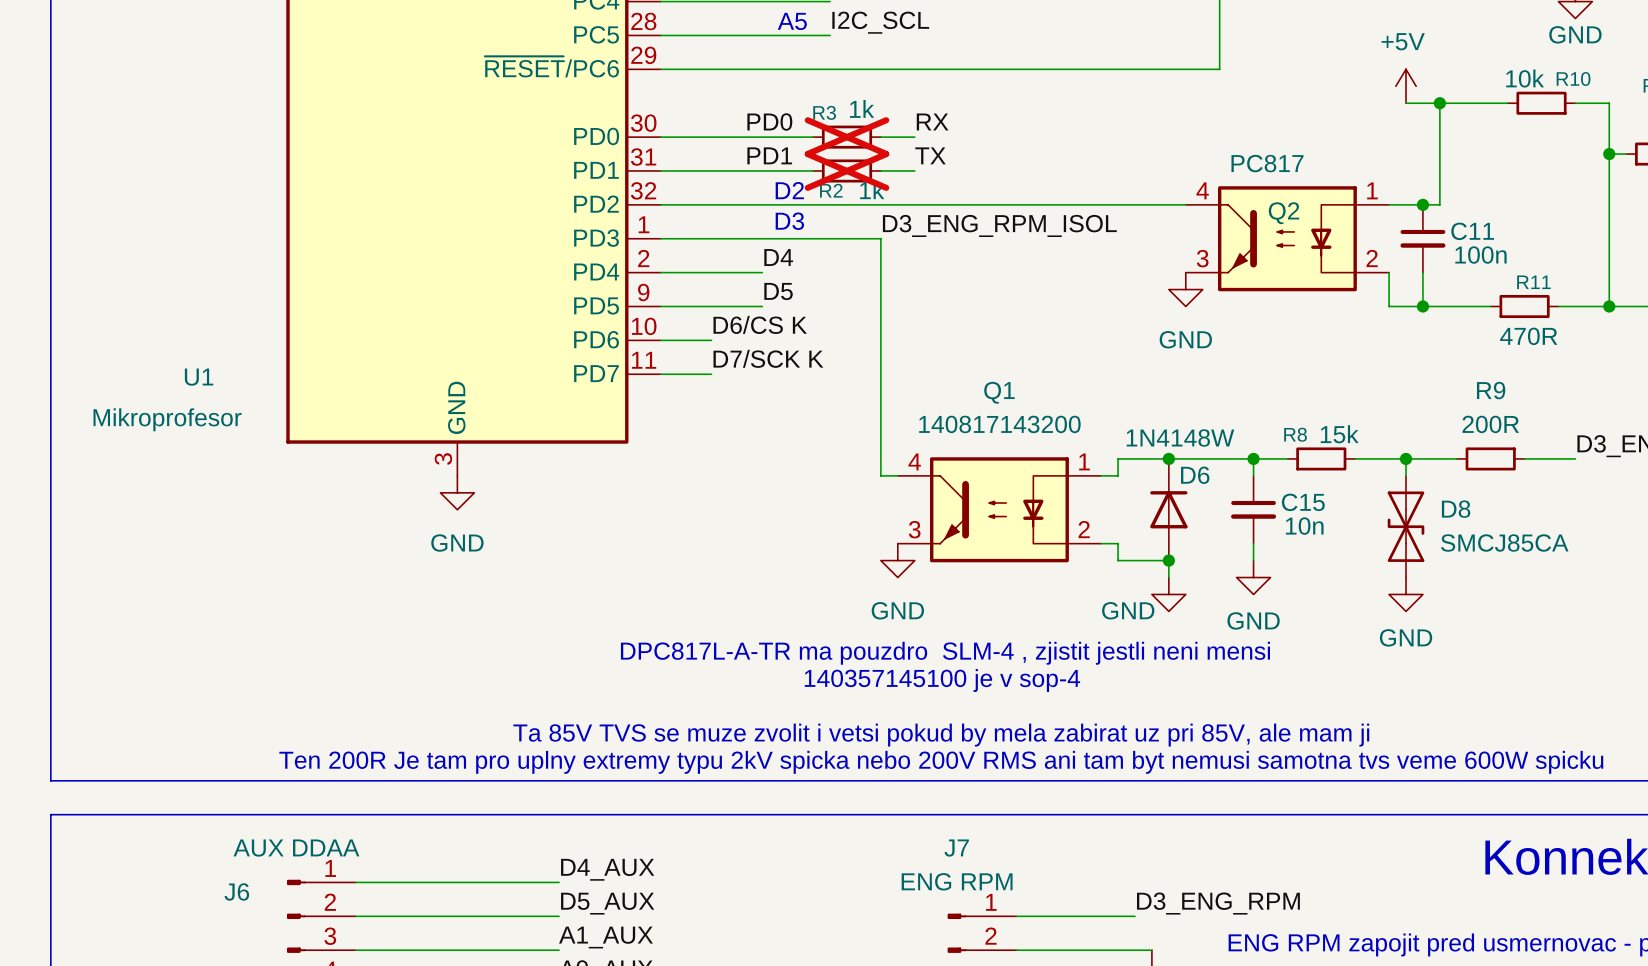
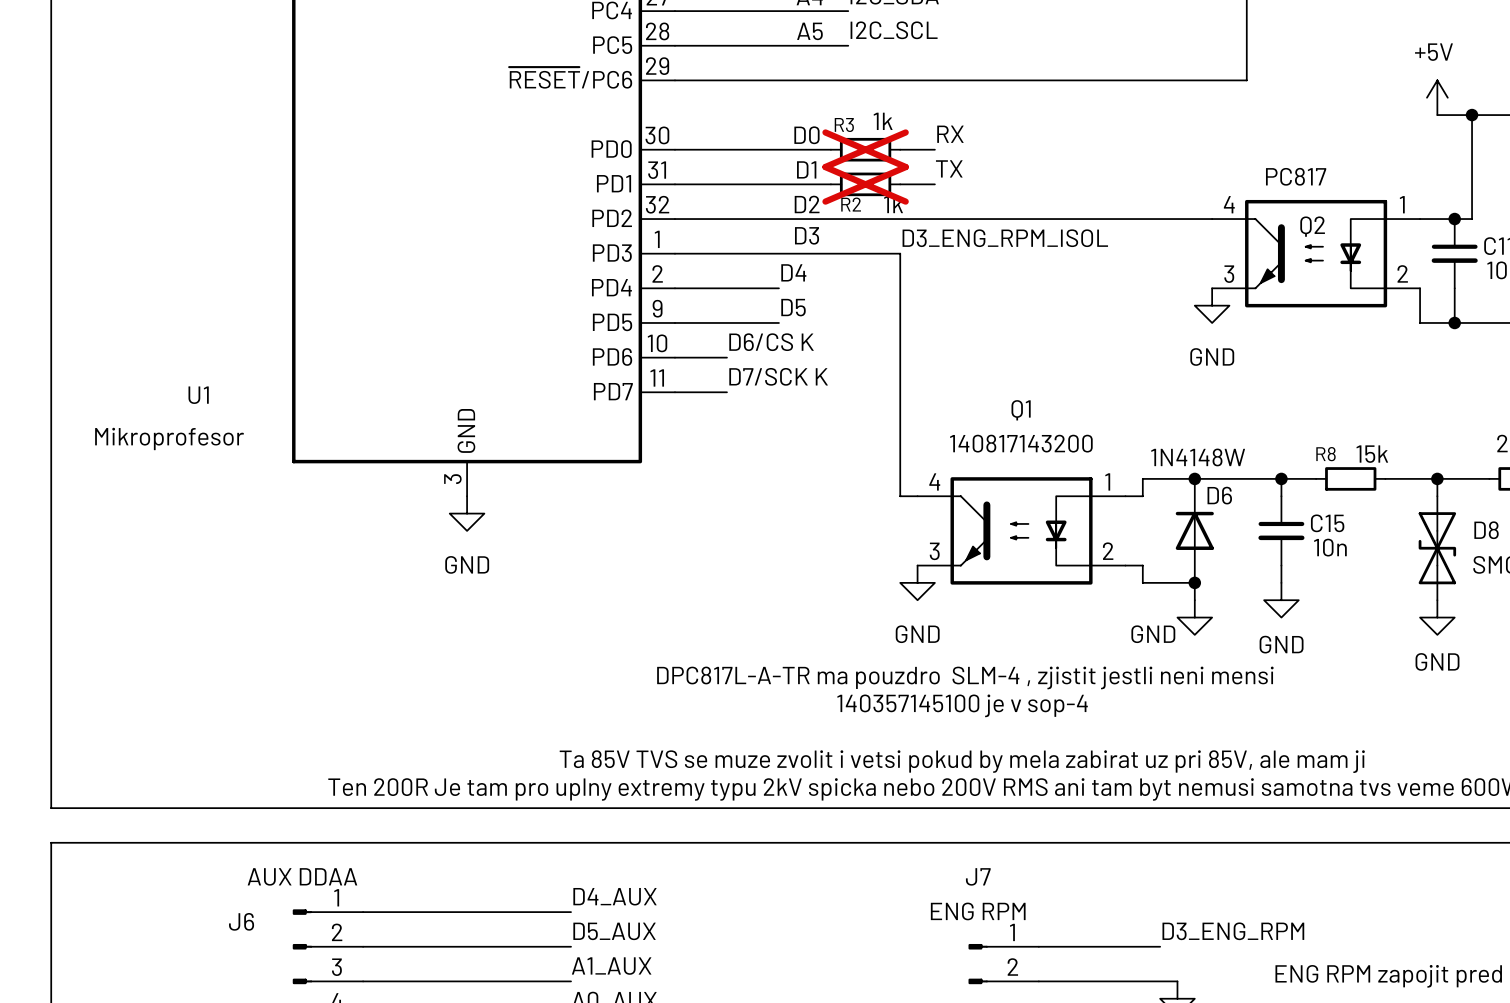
label: PD0 (769, 121) -> none
text: none -> D0 (806, 135)
label: PD1 (769, 155) -> none
text: none -> D1 (806, 169)

